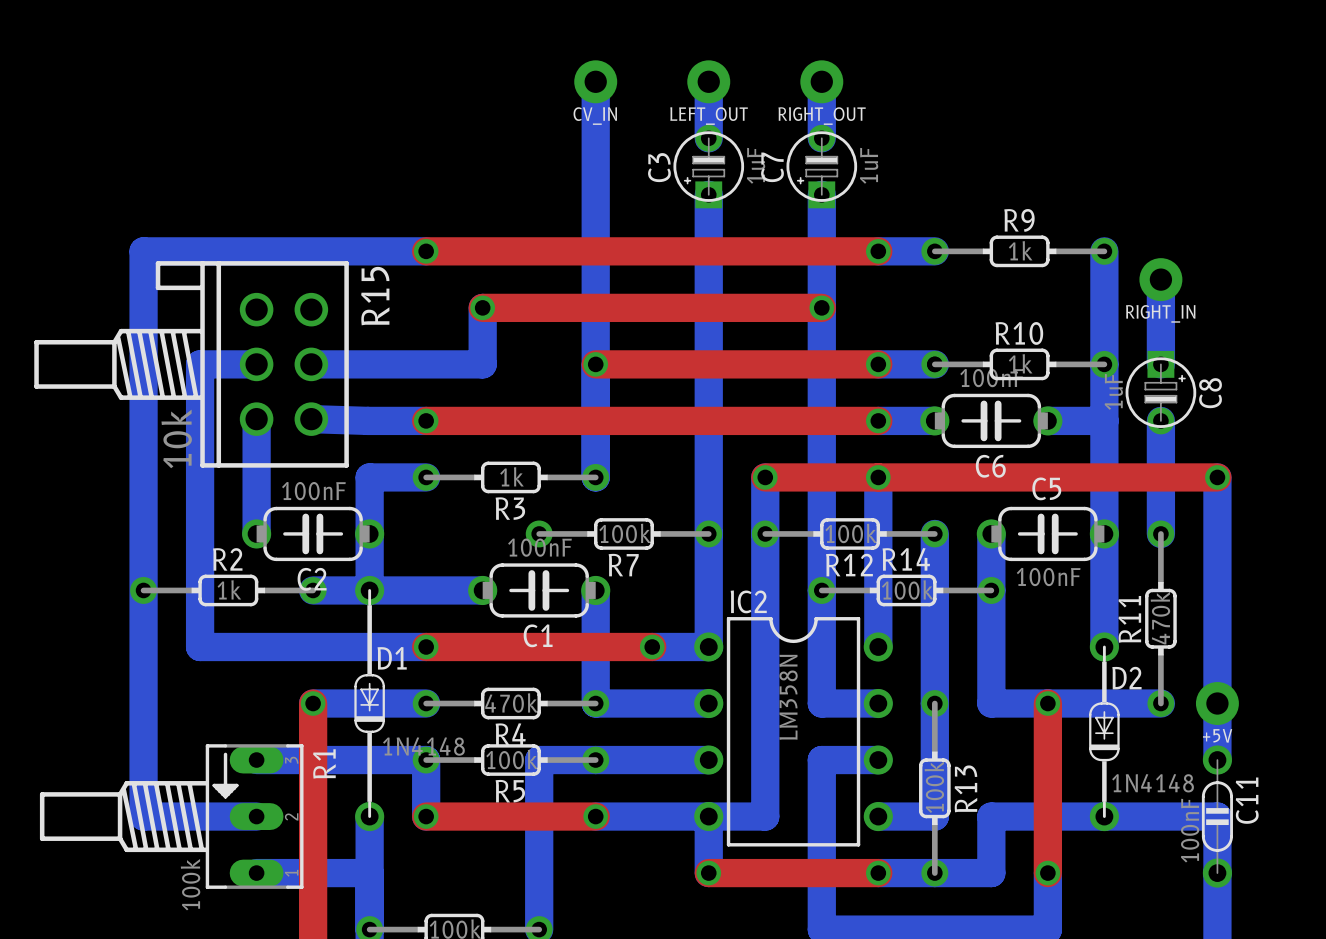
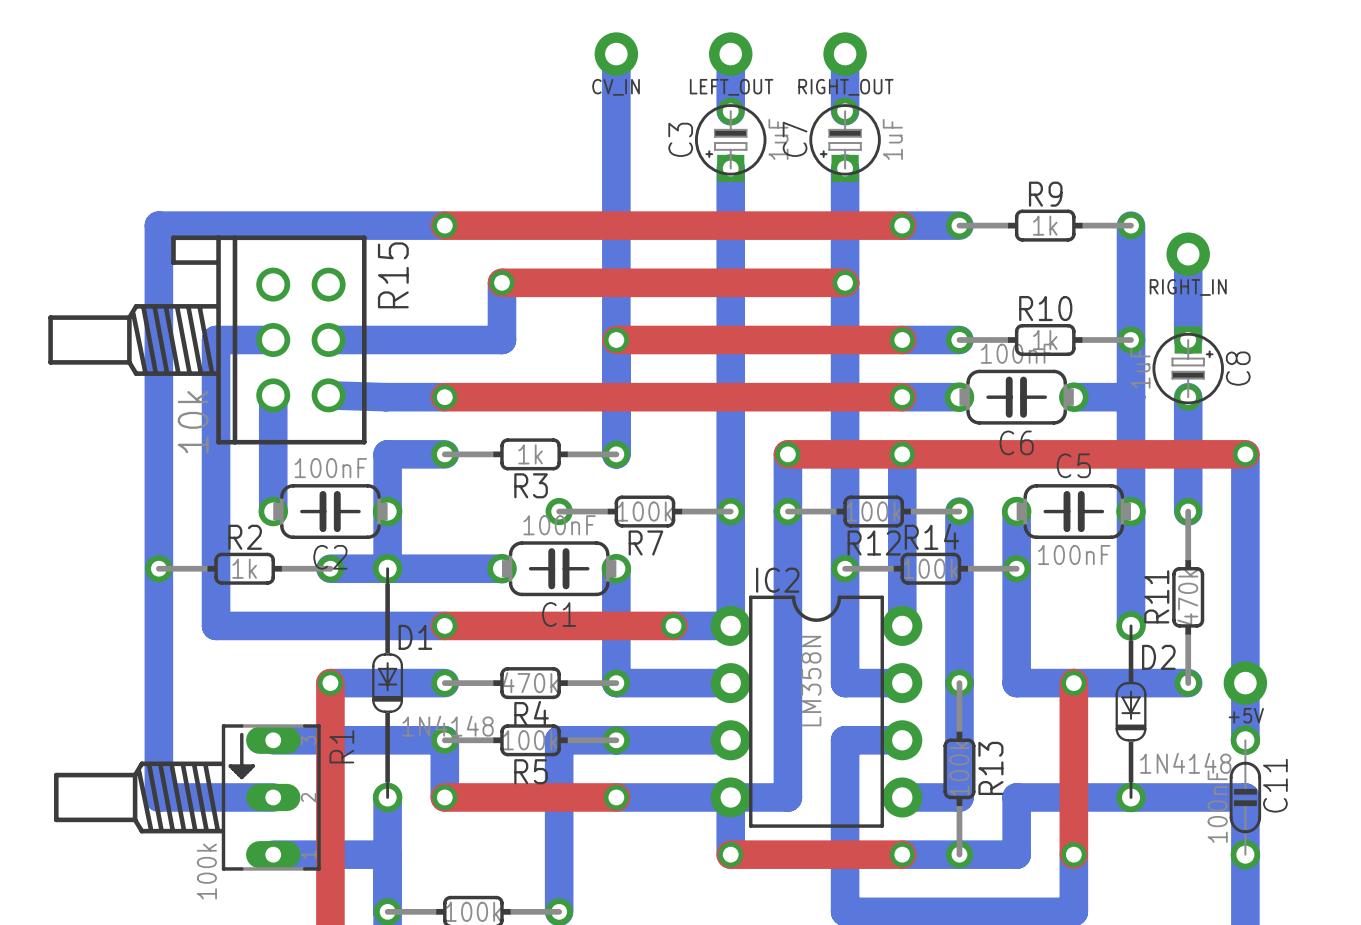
IC2 footprint: [694, 617, 893, 847] -> [710, 595, 923, 828]

